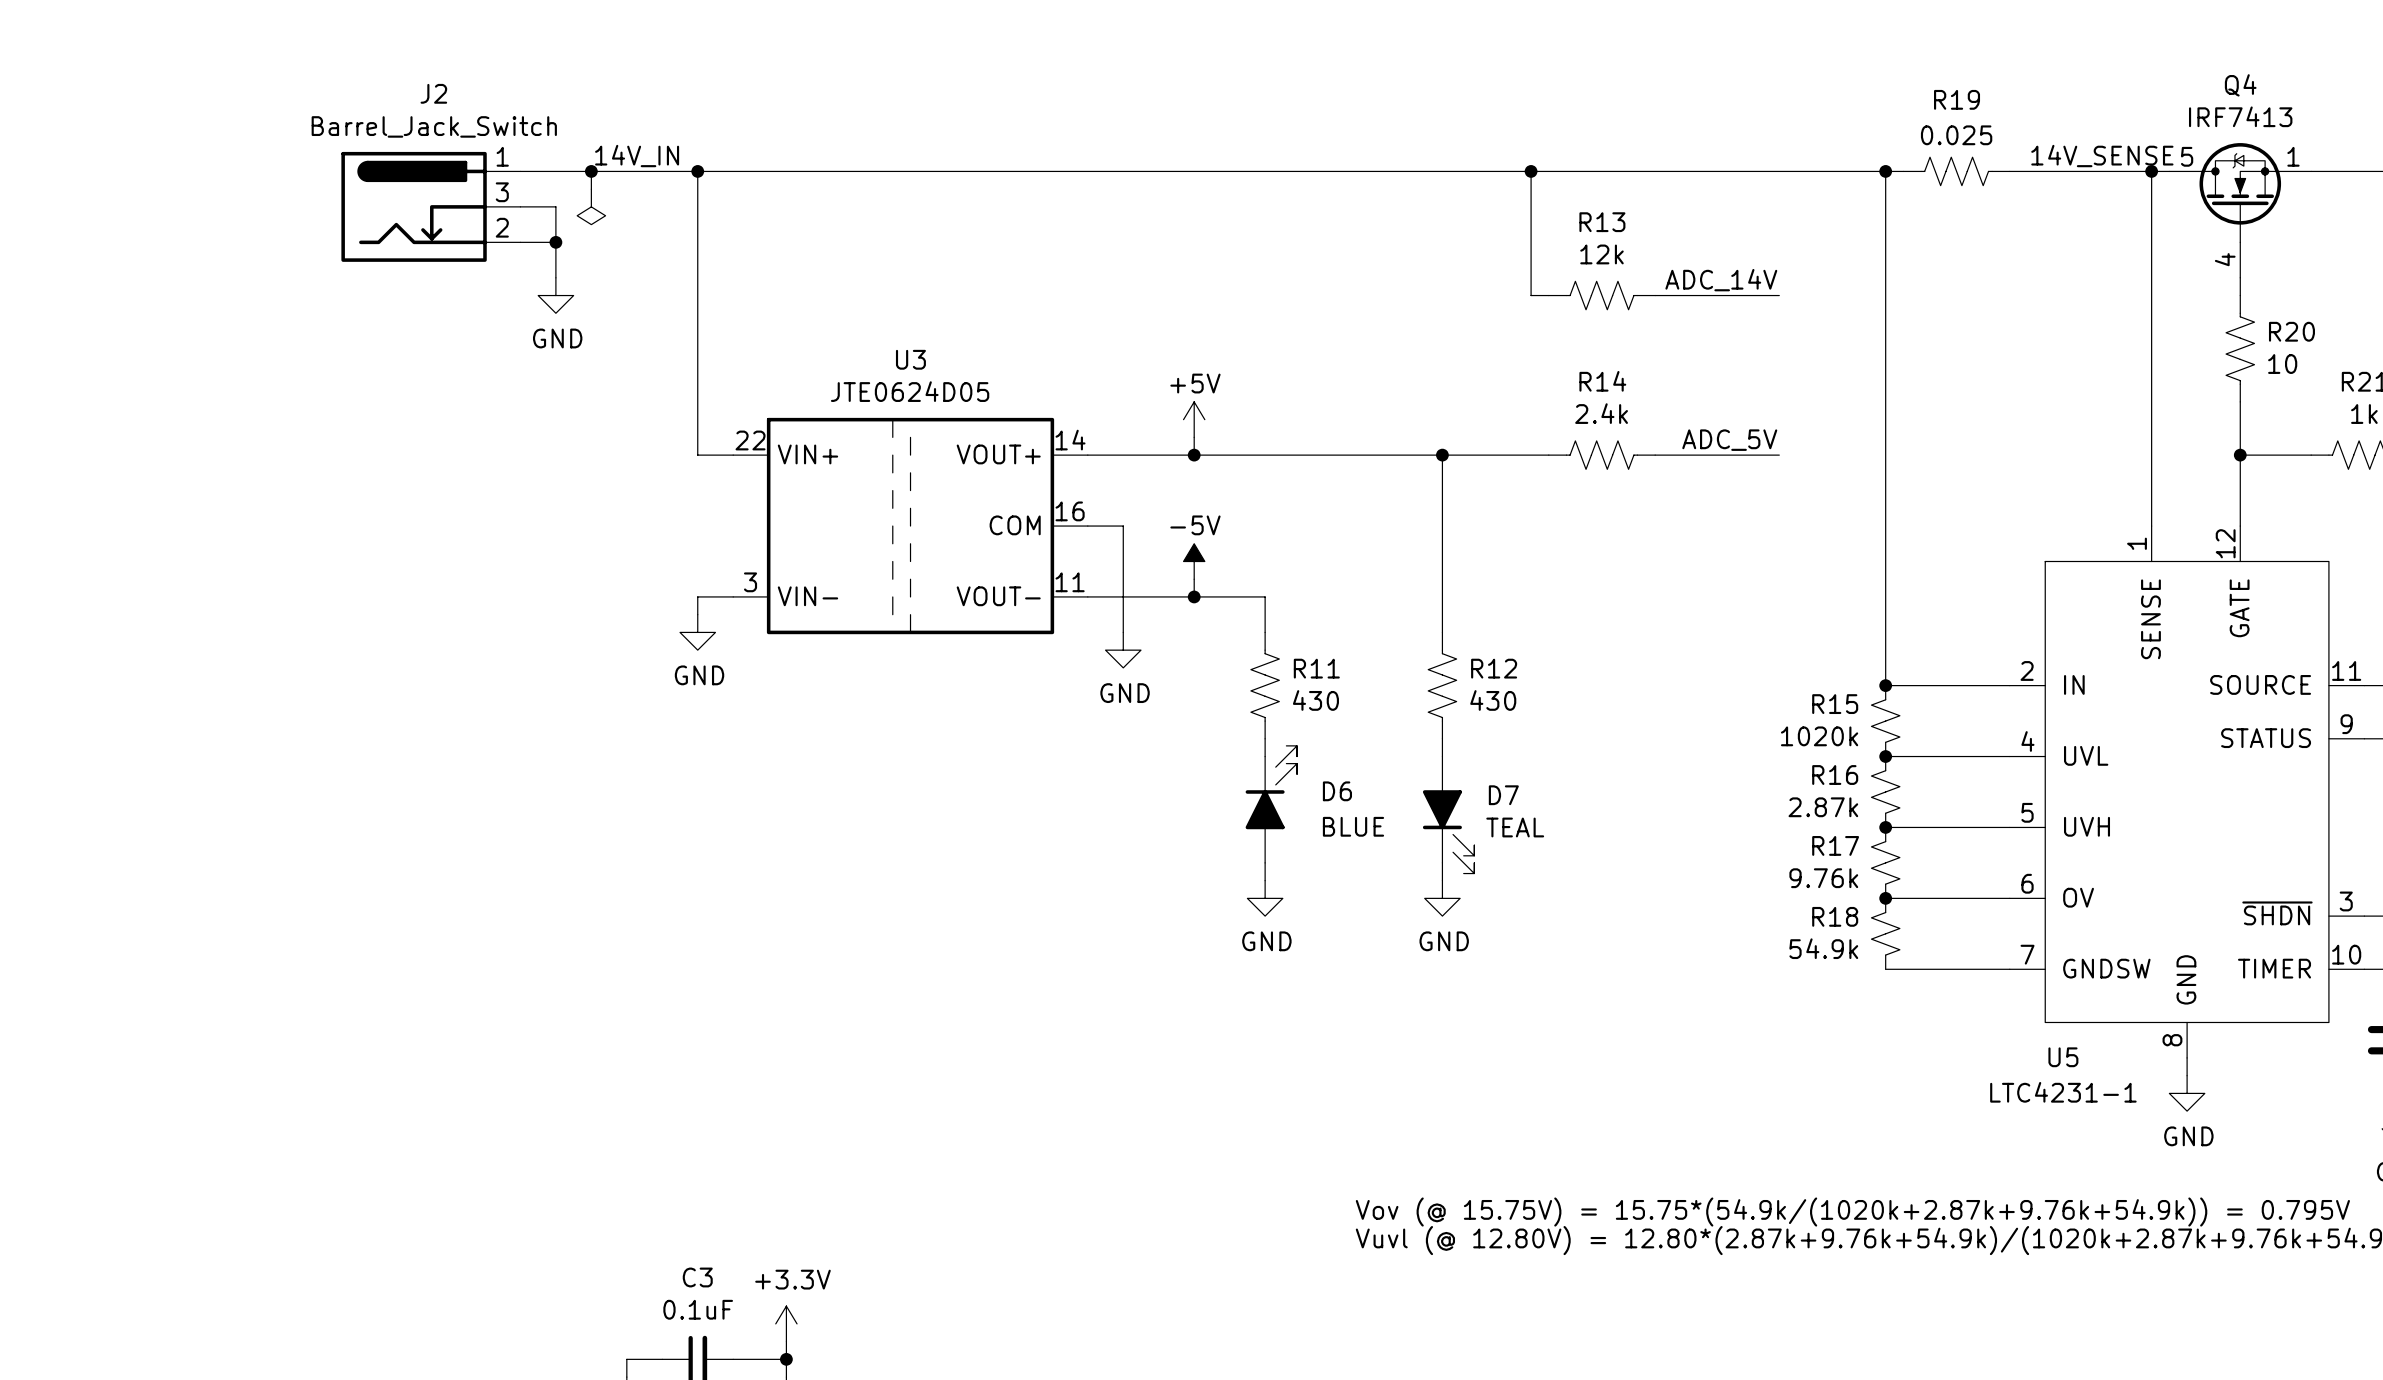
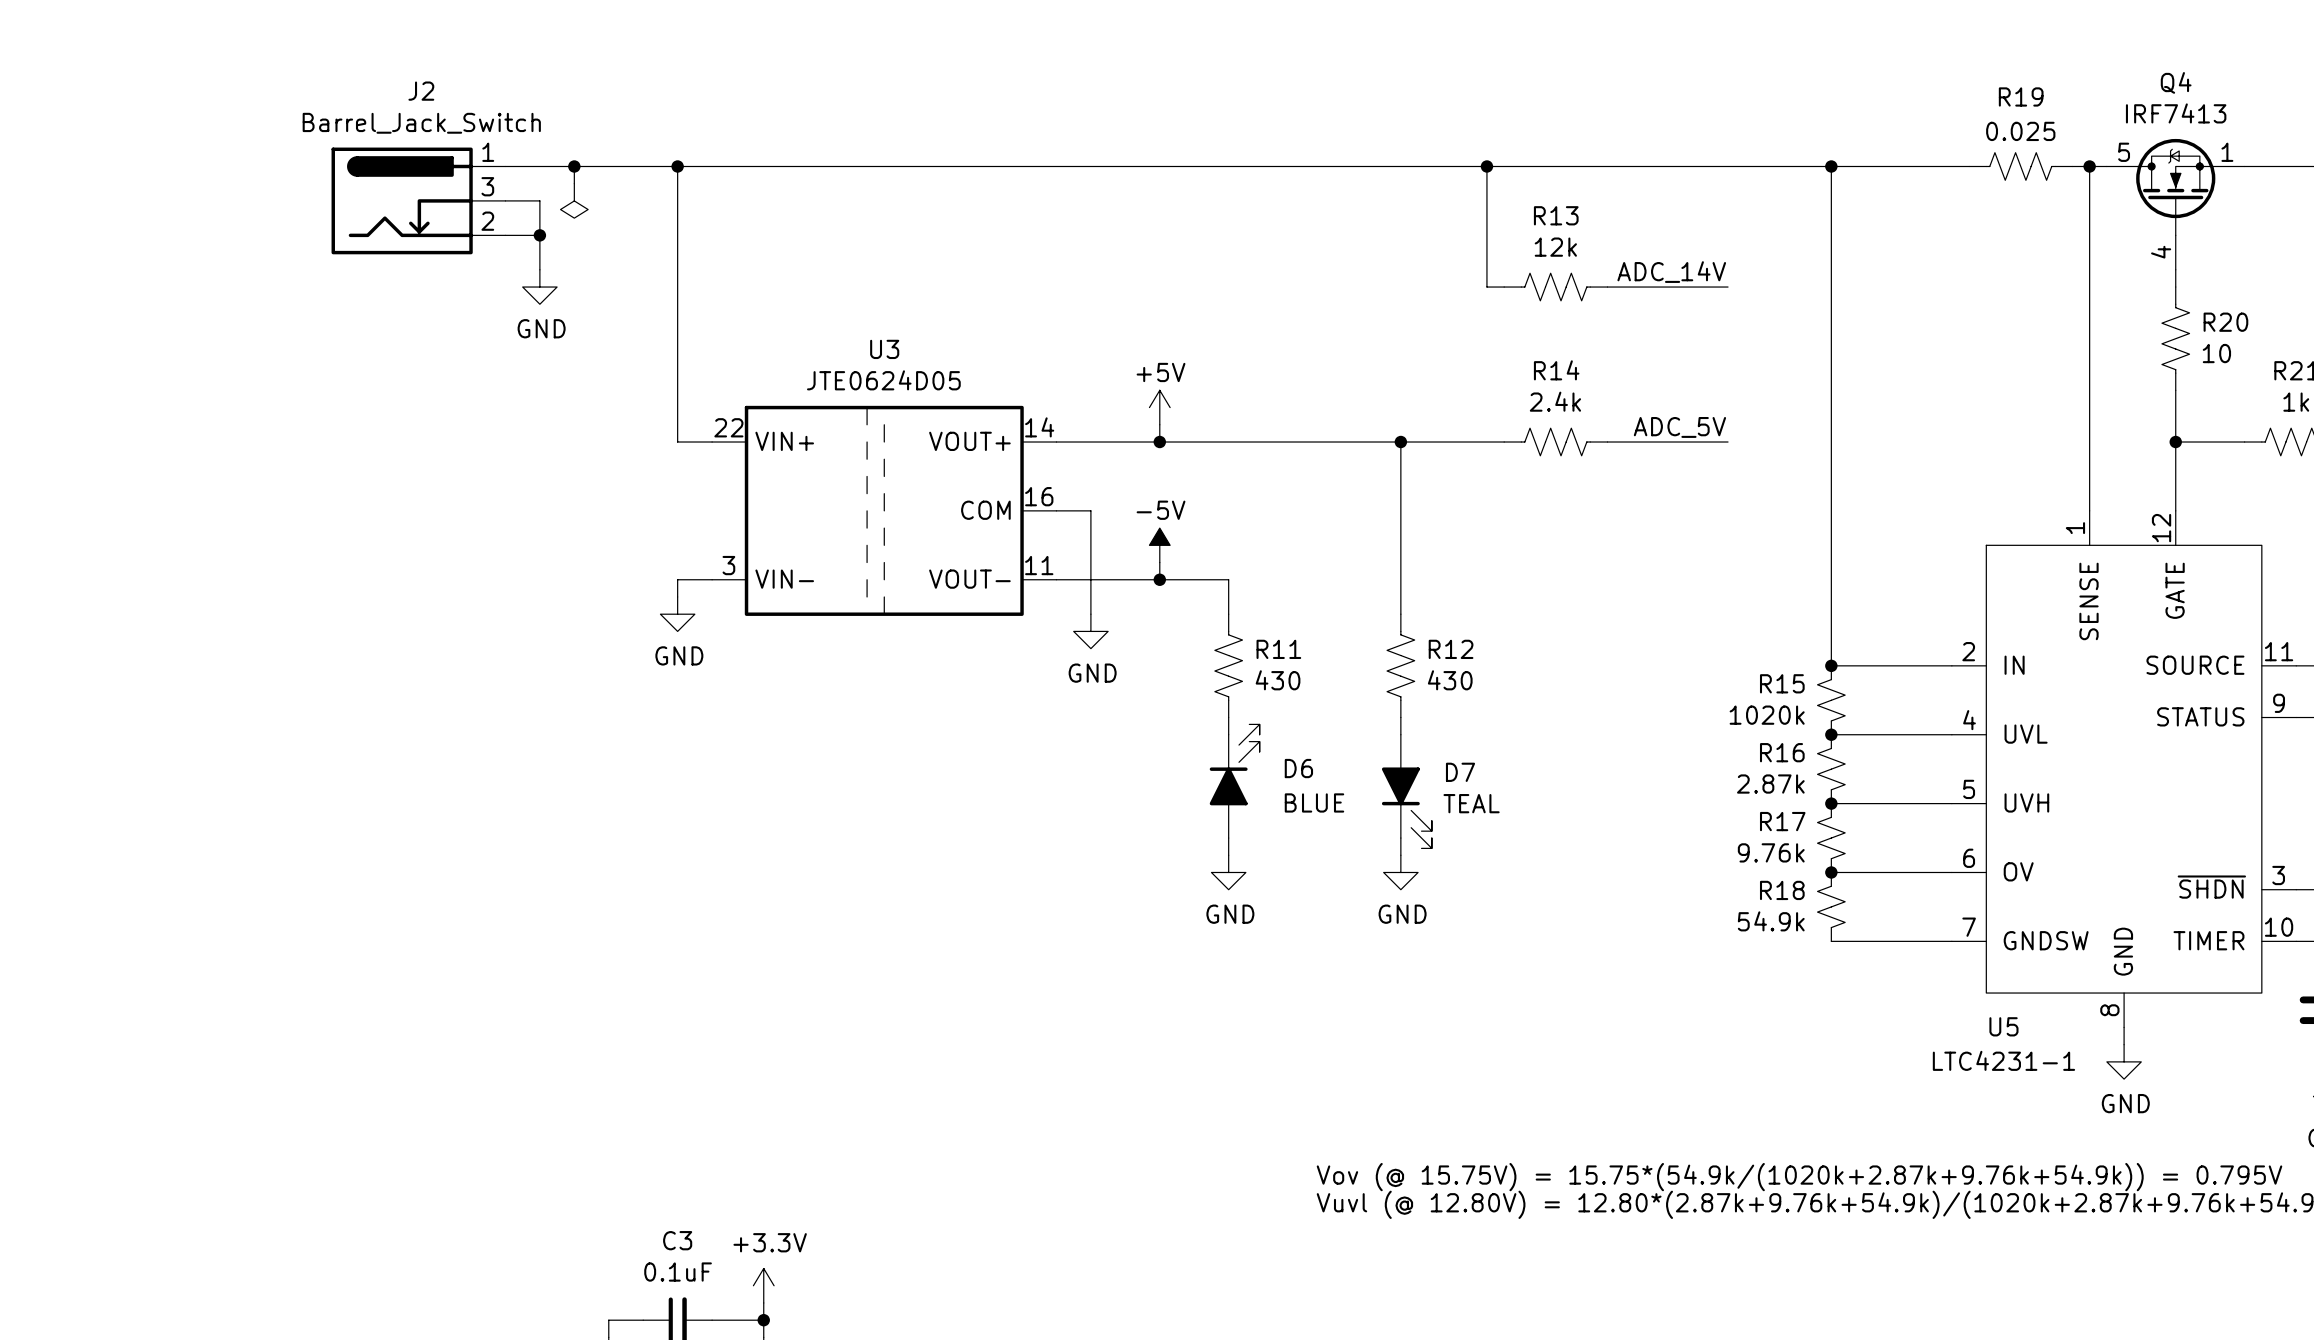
label: 14V_IN (637, 156) -> none
label: 14V_SENSE (2102, 156) -> none
R19 position: (1956, 171) -> (2020, 166)
wire: (2027, 171) (2133, 171) -> (1848, 166) (1951, 166)

